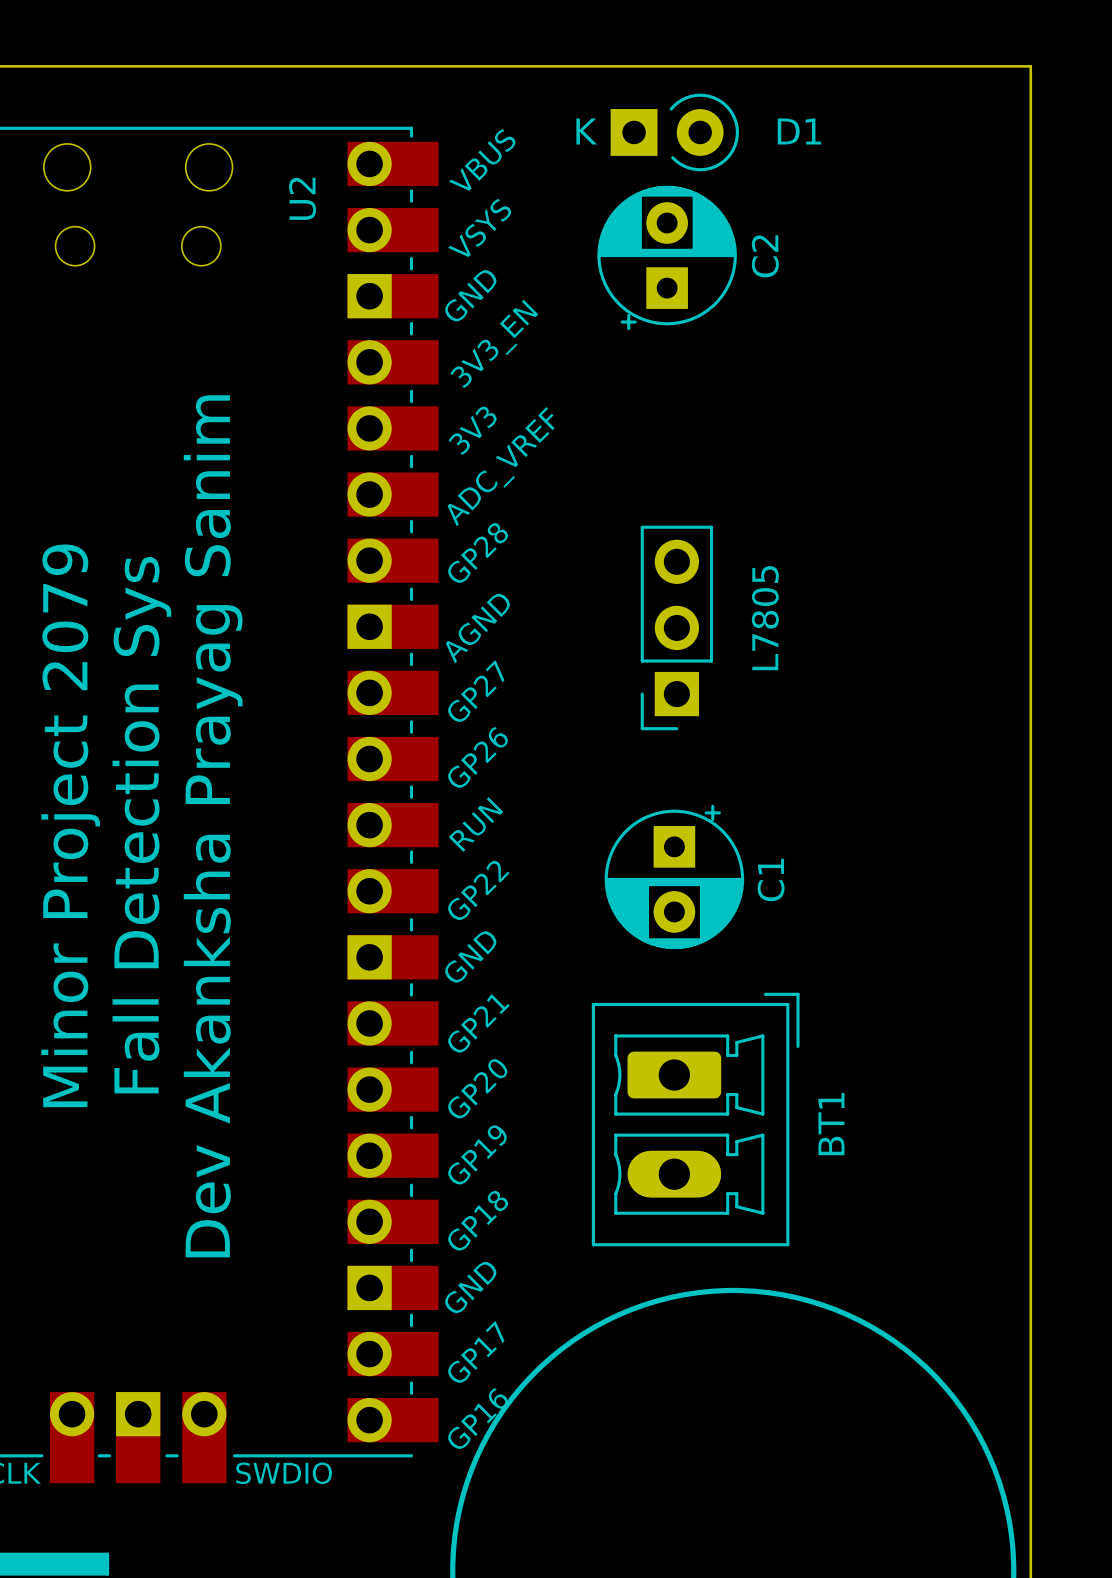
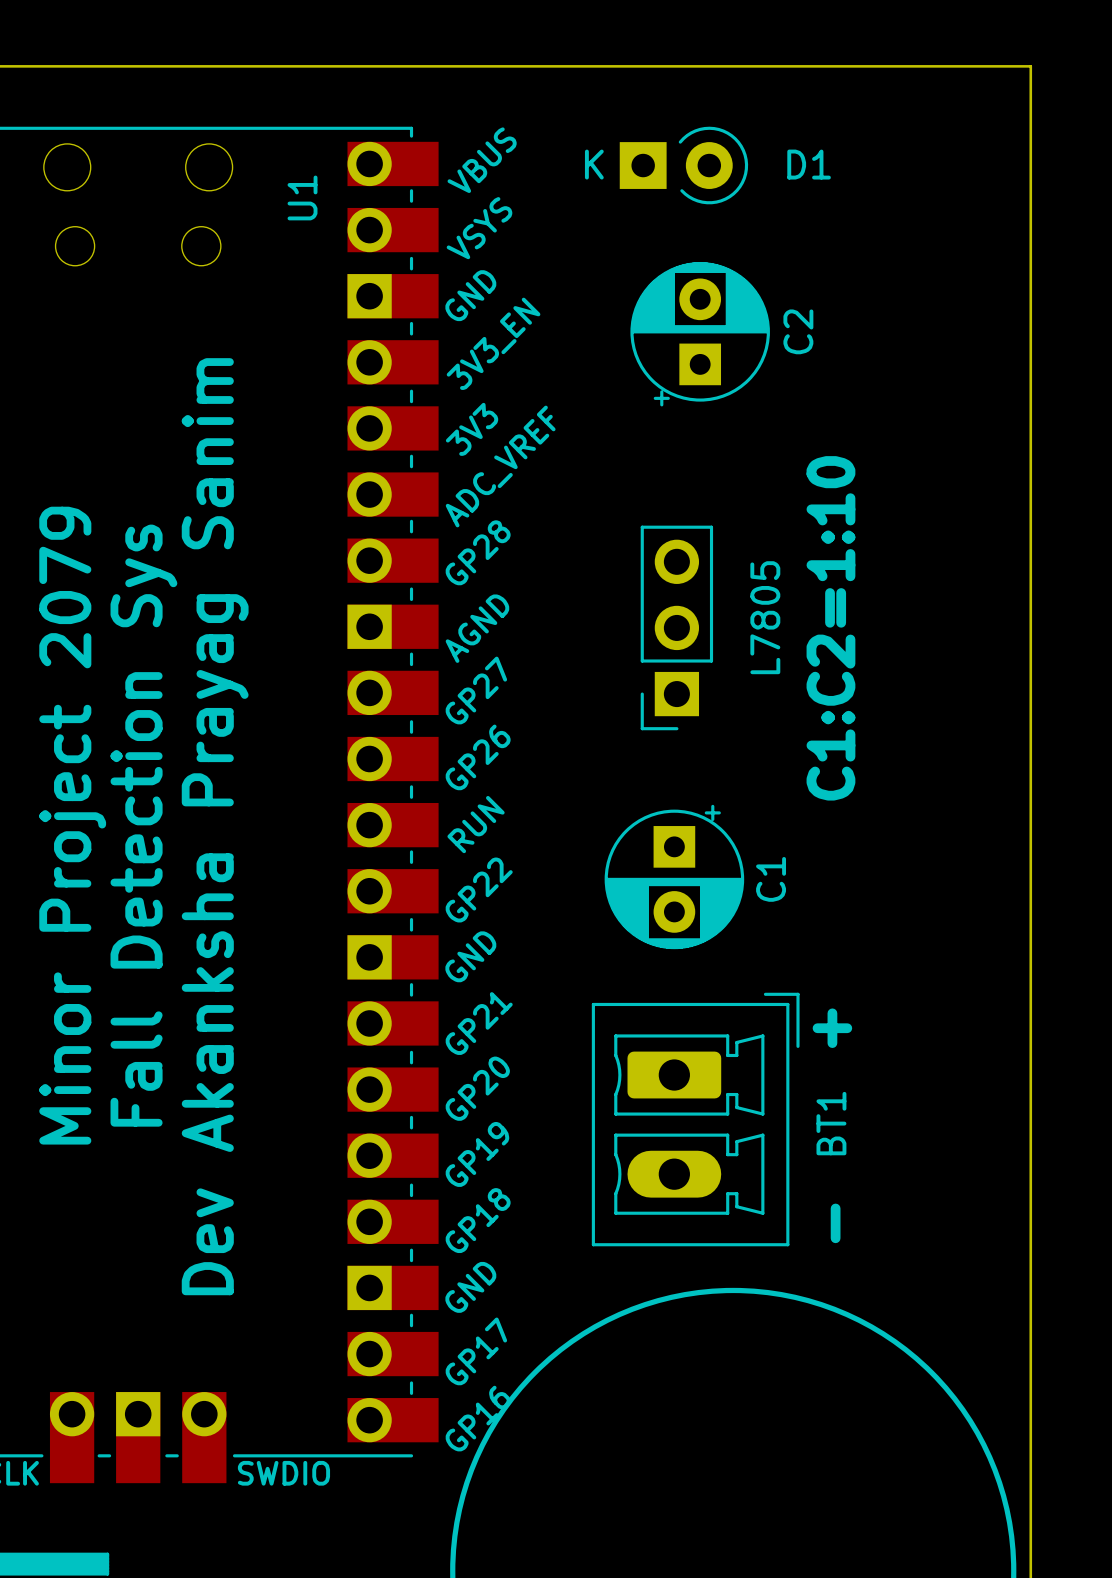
D1 position: (674, 132) -> (683, 165)
U2 name: U2 (302, 198) -> U1 (302, 197)
C2 position: (667, 257) -> (700, 334)
text: none -> C1:C2=1:10 (830, 628)
text: none -> + (832, 1028)
text: none -> - (835, 1223)

